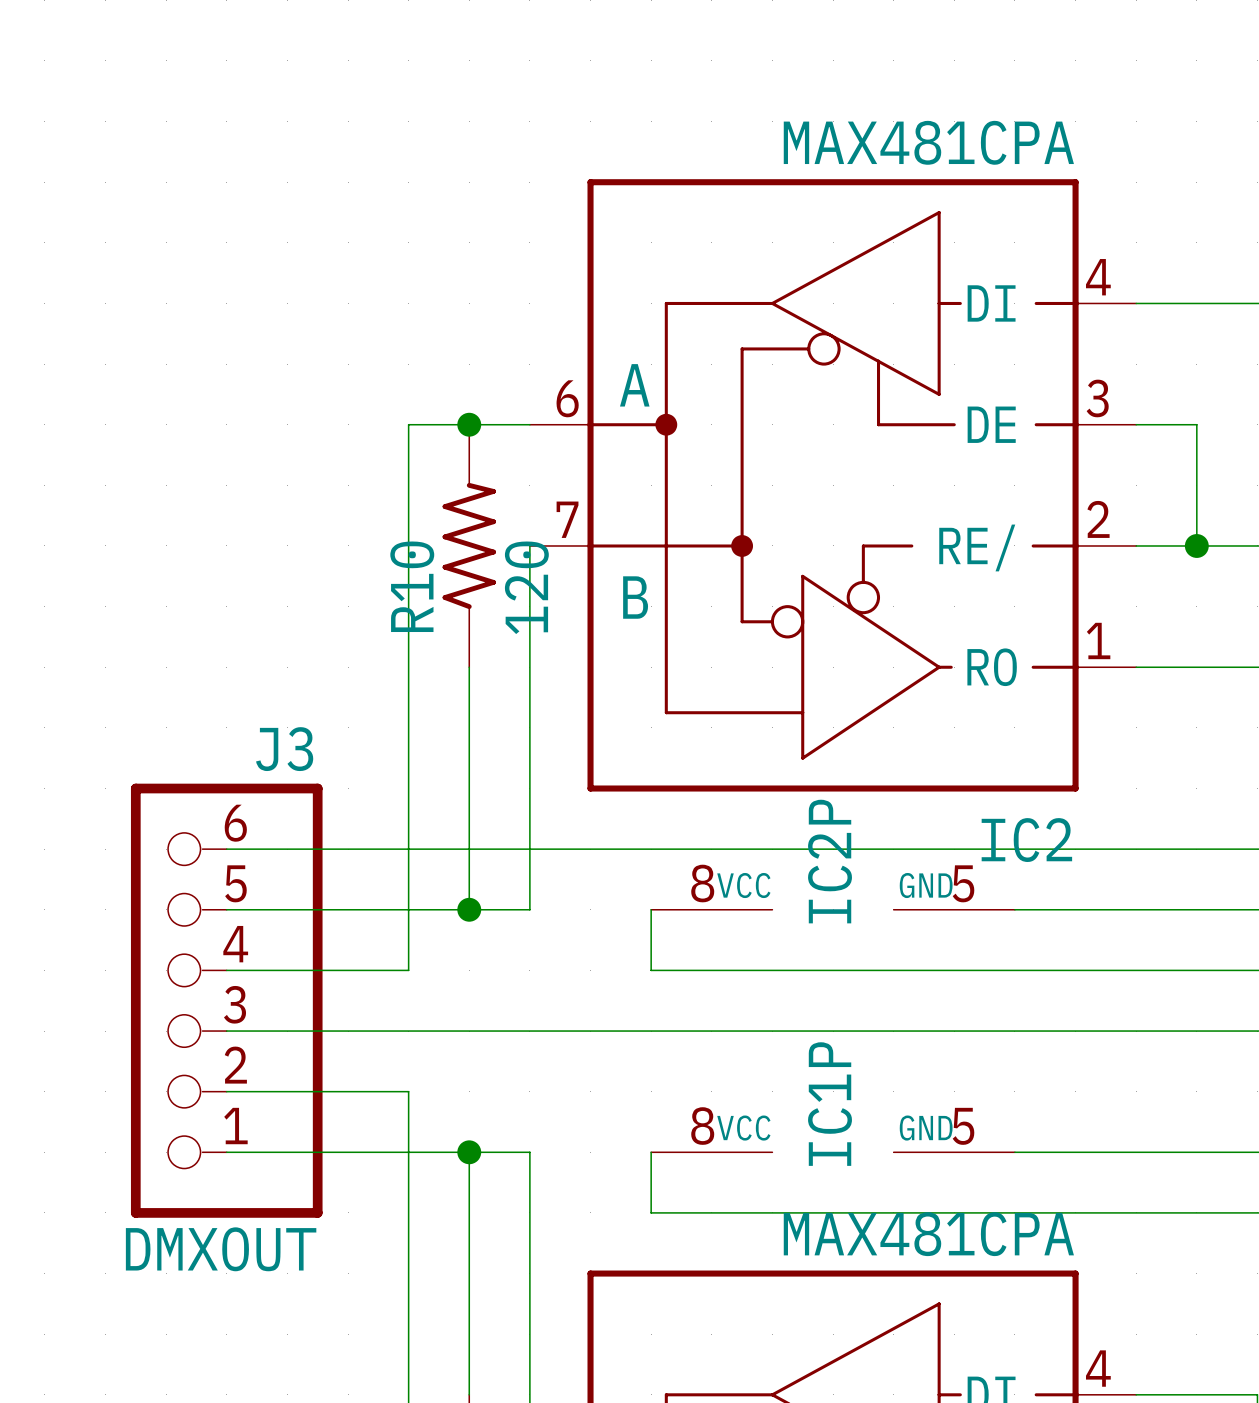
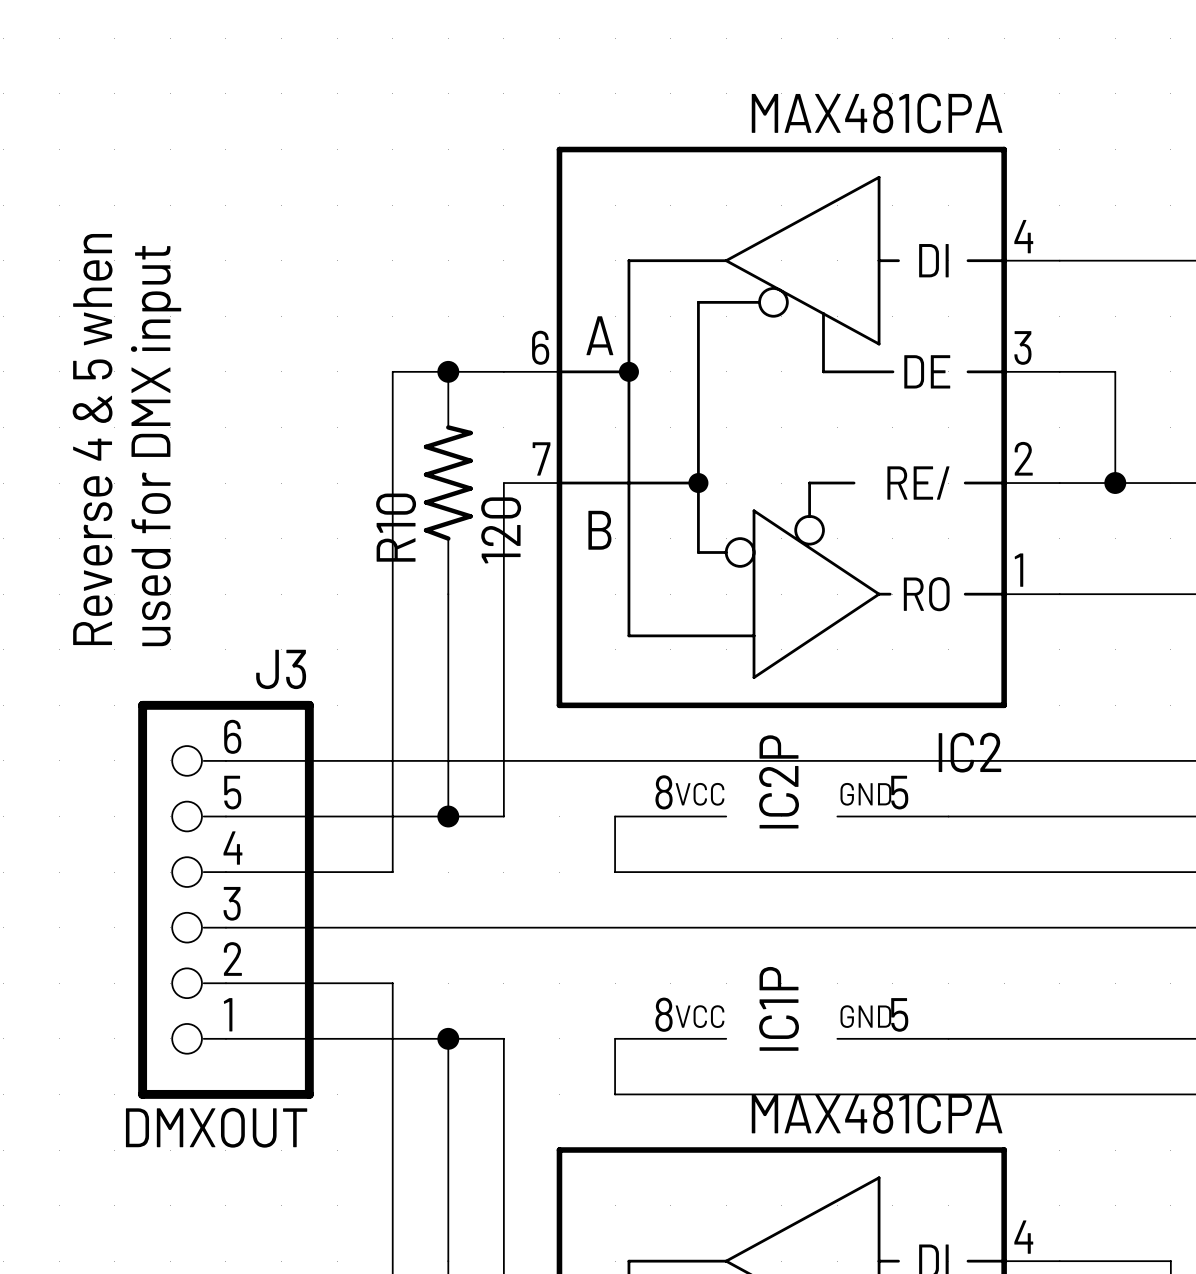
text: none -> used for DMX input (156, 446)
text: none -> Reverse 4 & 5 when (92, 439)

